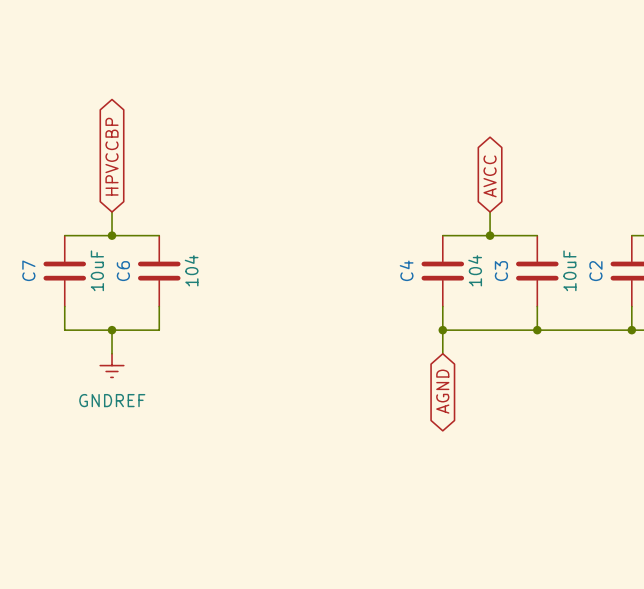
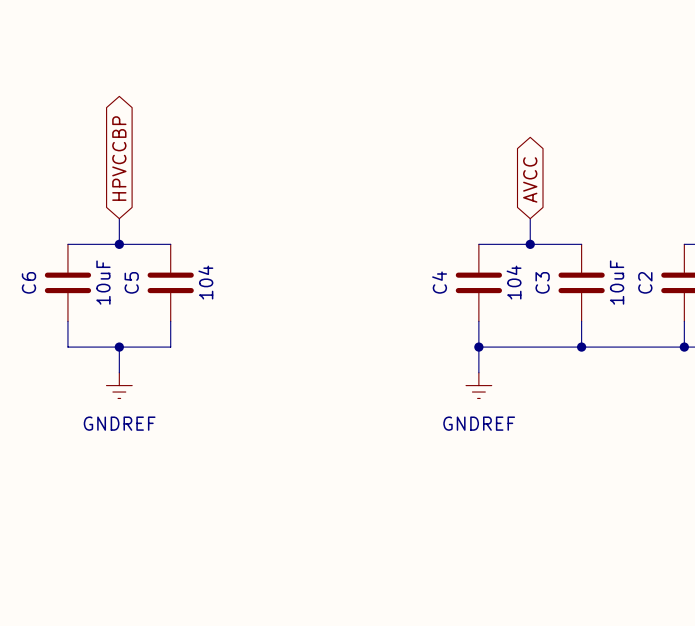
C7 name: C7 (28, 270) -> C6 (28, 282)
C6 name: C6 (123, 271) -> C5 (131, 282)
power symbol: none -> GNDREF (478, 385)
global label: AGND (442, 391) -> none

